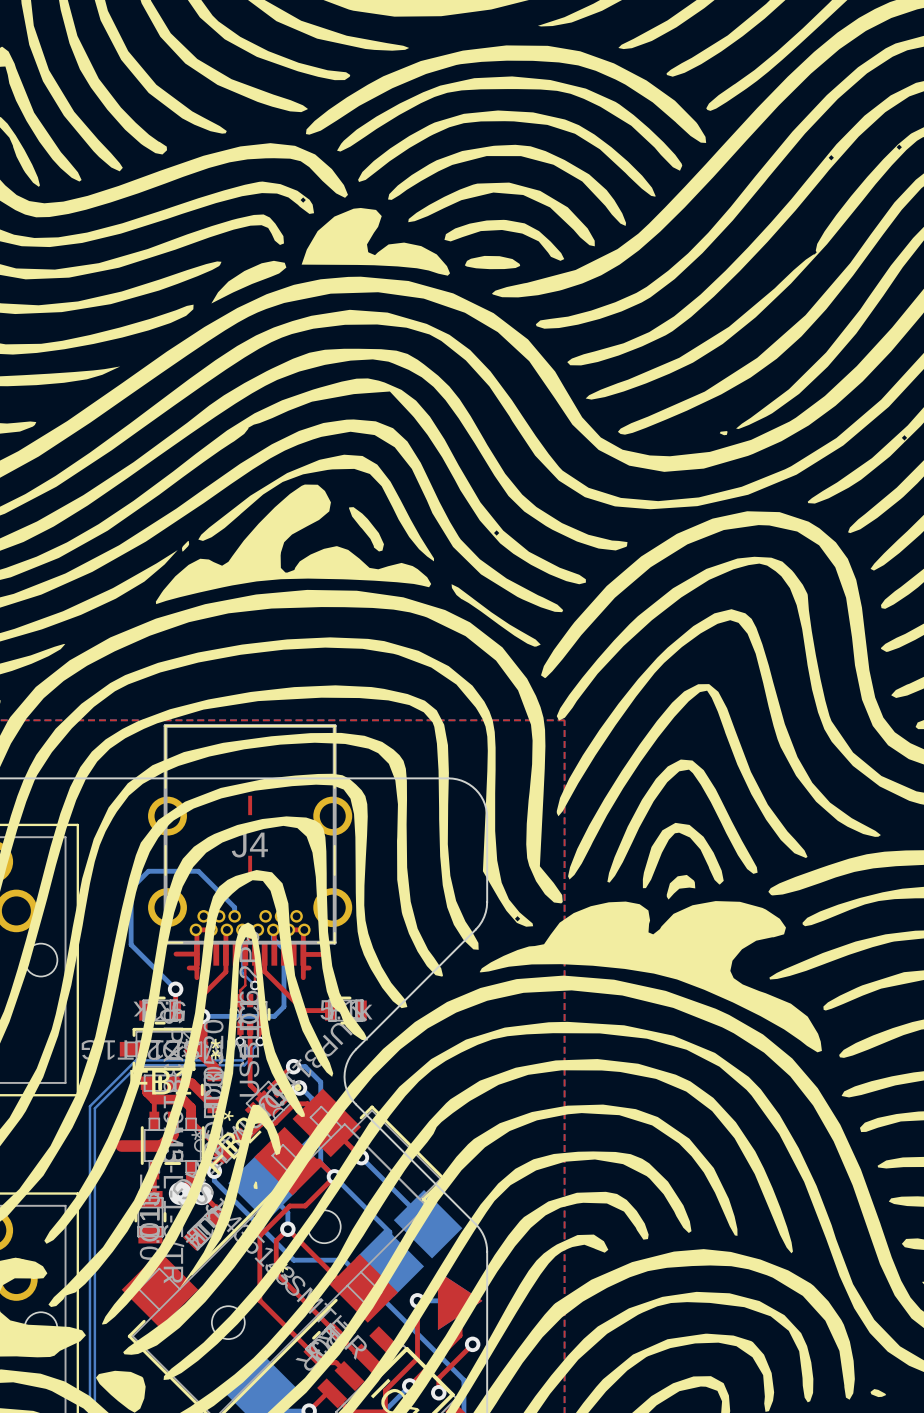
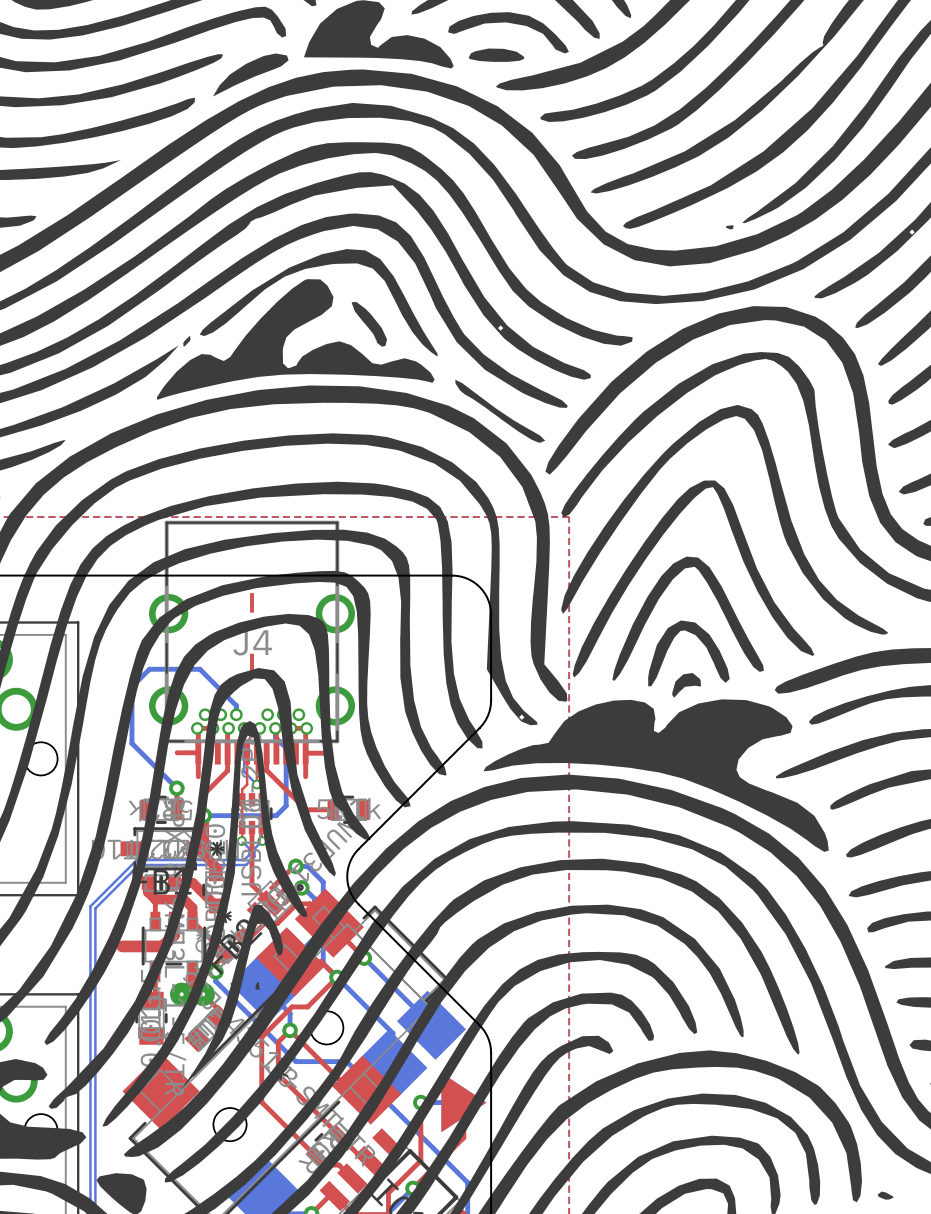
top track: (189, 968) (196, 968) -> none
top track: (303, 968) (309, 968) -> none
top track: (472, 1344) (438, 1378) (438, 1392) -> none
via: (472, 1344) -> none
via: (438, 1392) -> none

